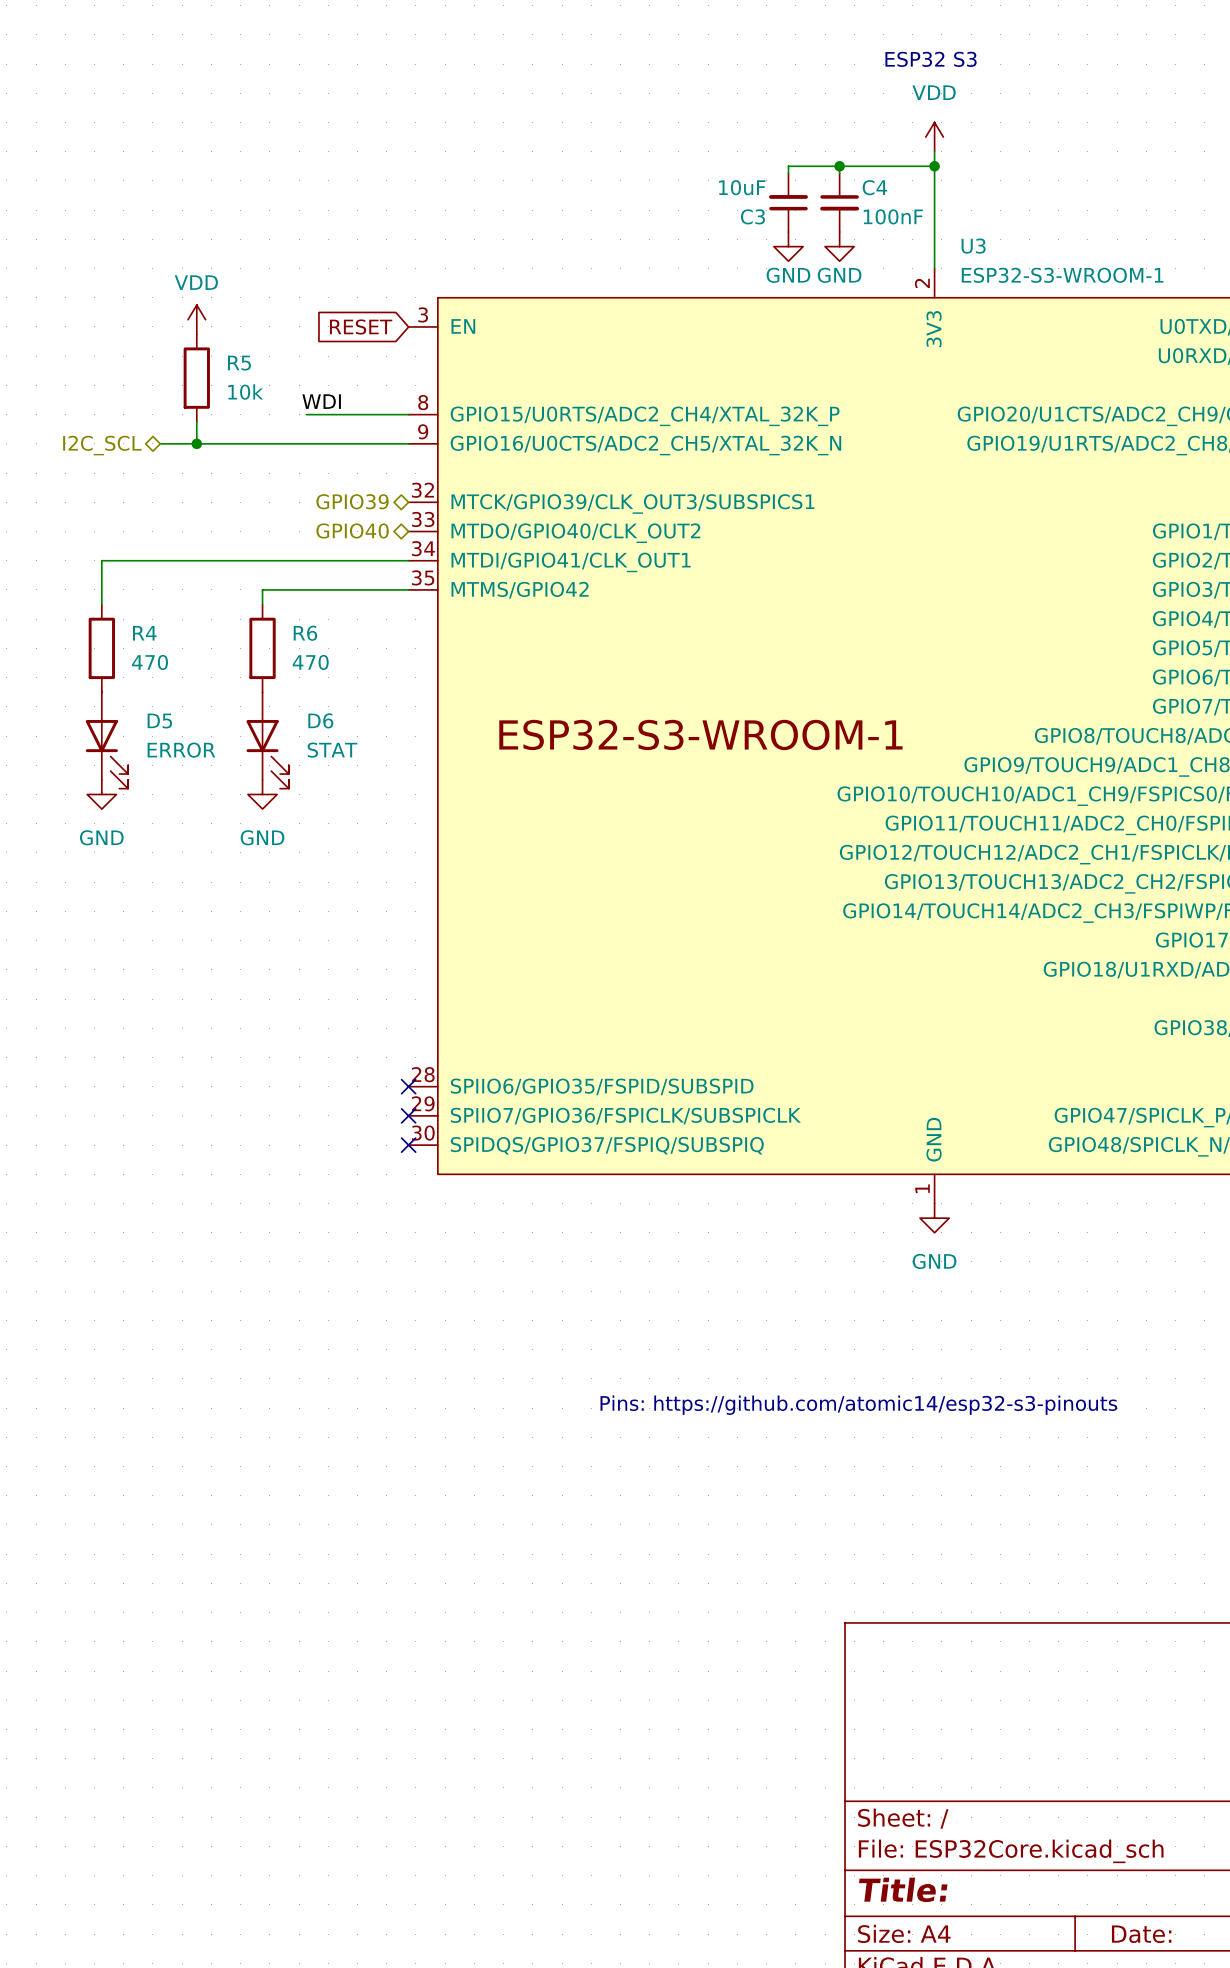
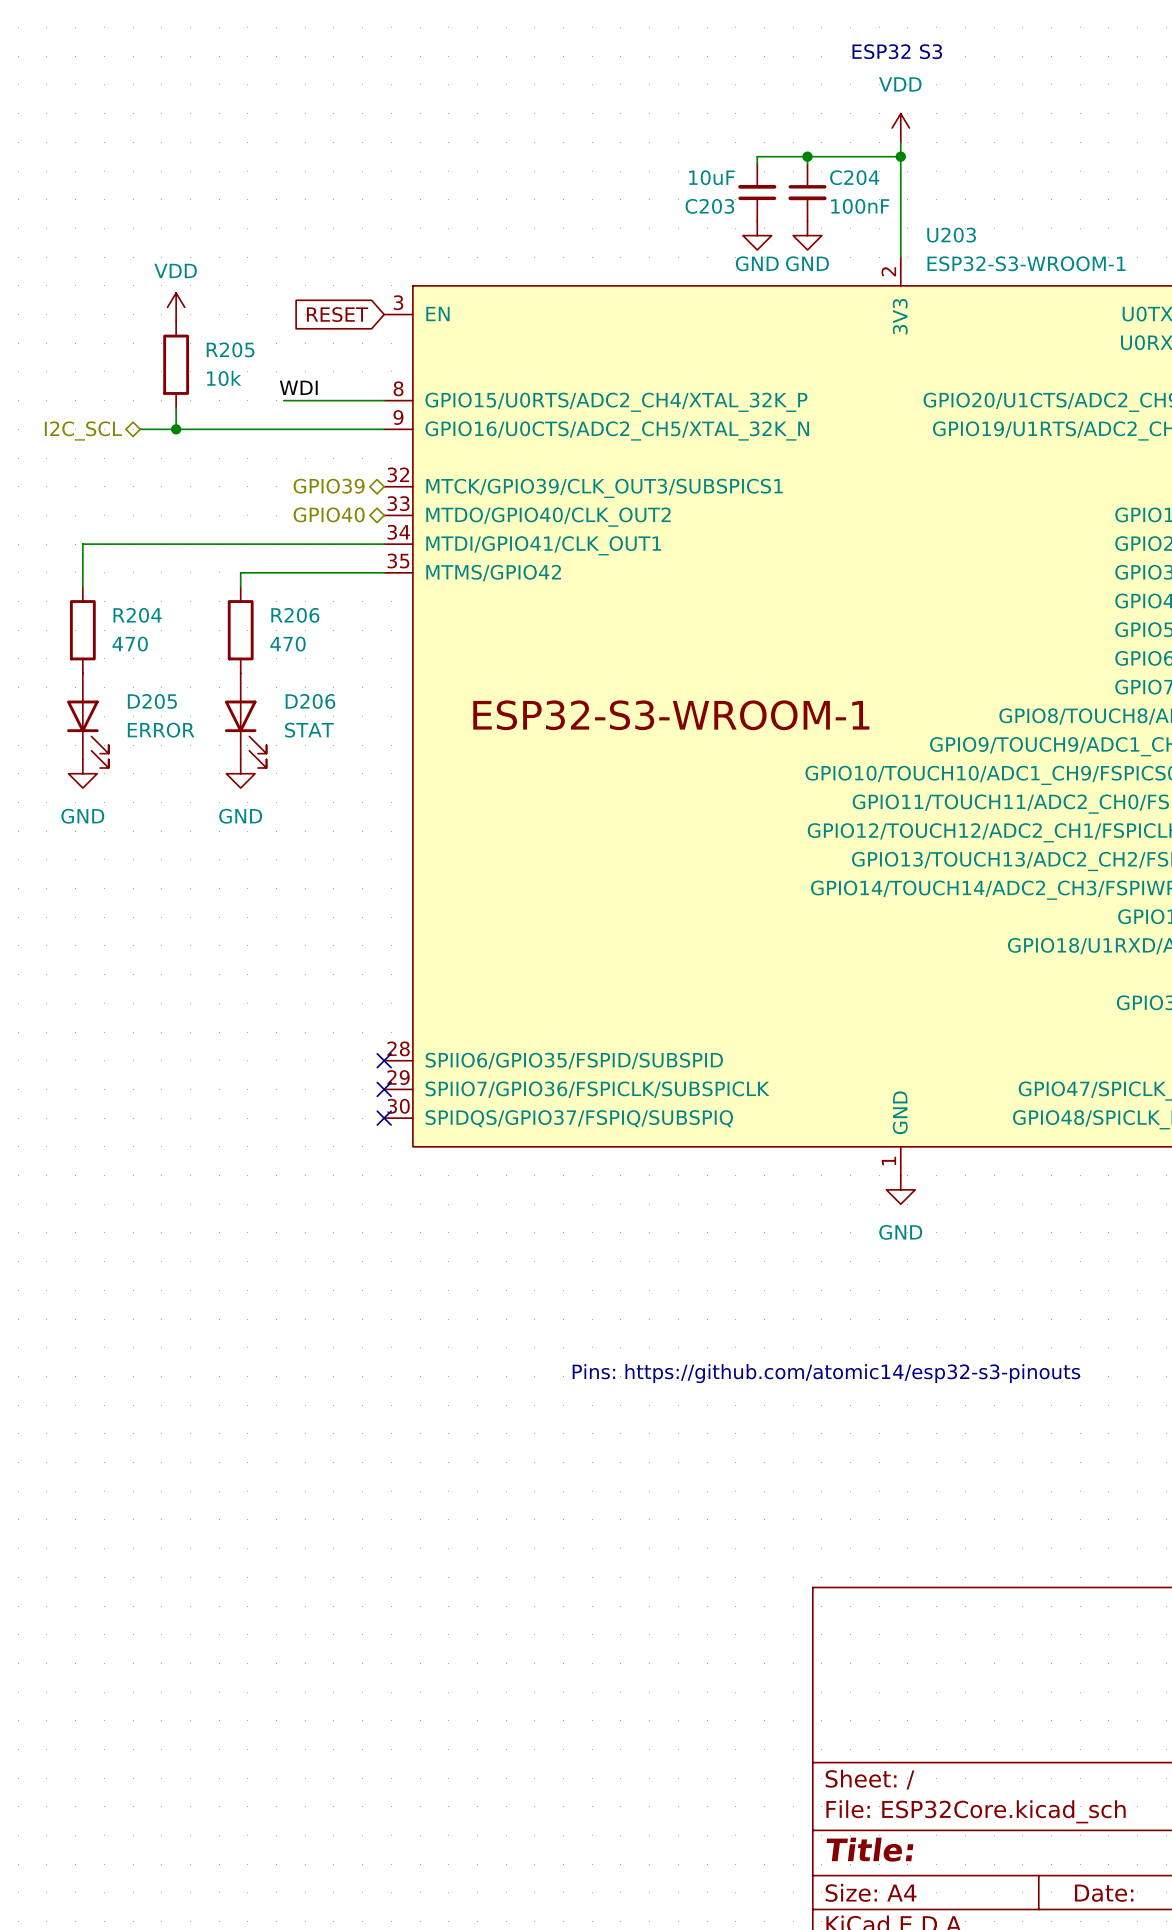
C4 name: C4 (874, 187) -> C204 (854, 177)
C3 name: C3 (752, 216) -> C203 (709, 206)
U3 name: U3 (973, 246) -> U203 (951, 235)
R5 name: R5 (239, 363) -> R205 (230, 349)
R4 name: R4 (144, 633) -> R204 (137, 615)
R6 name: R6 (305, 633) -> R206 (295, 615)
D6 name: D6 (320, 720) -> D206 (310, 701)
D5 name: D5 (159, 721) -> D205 (152, 701)

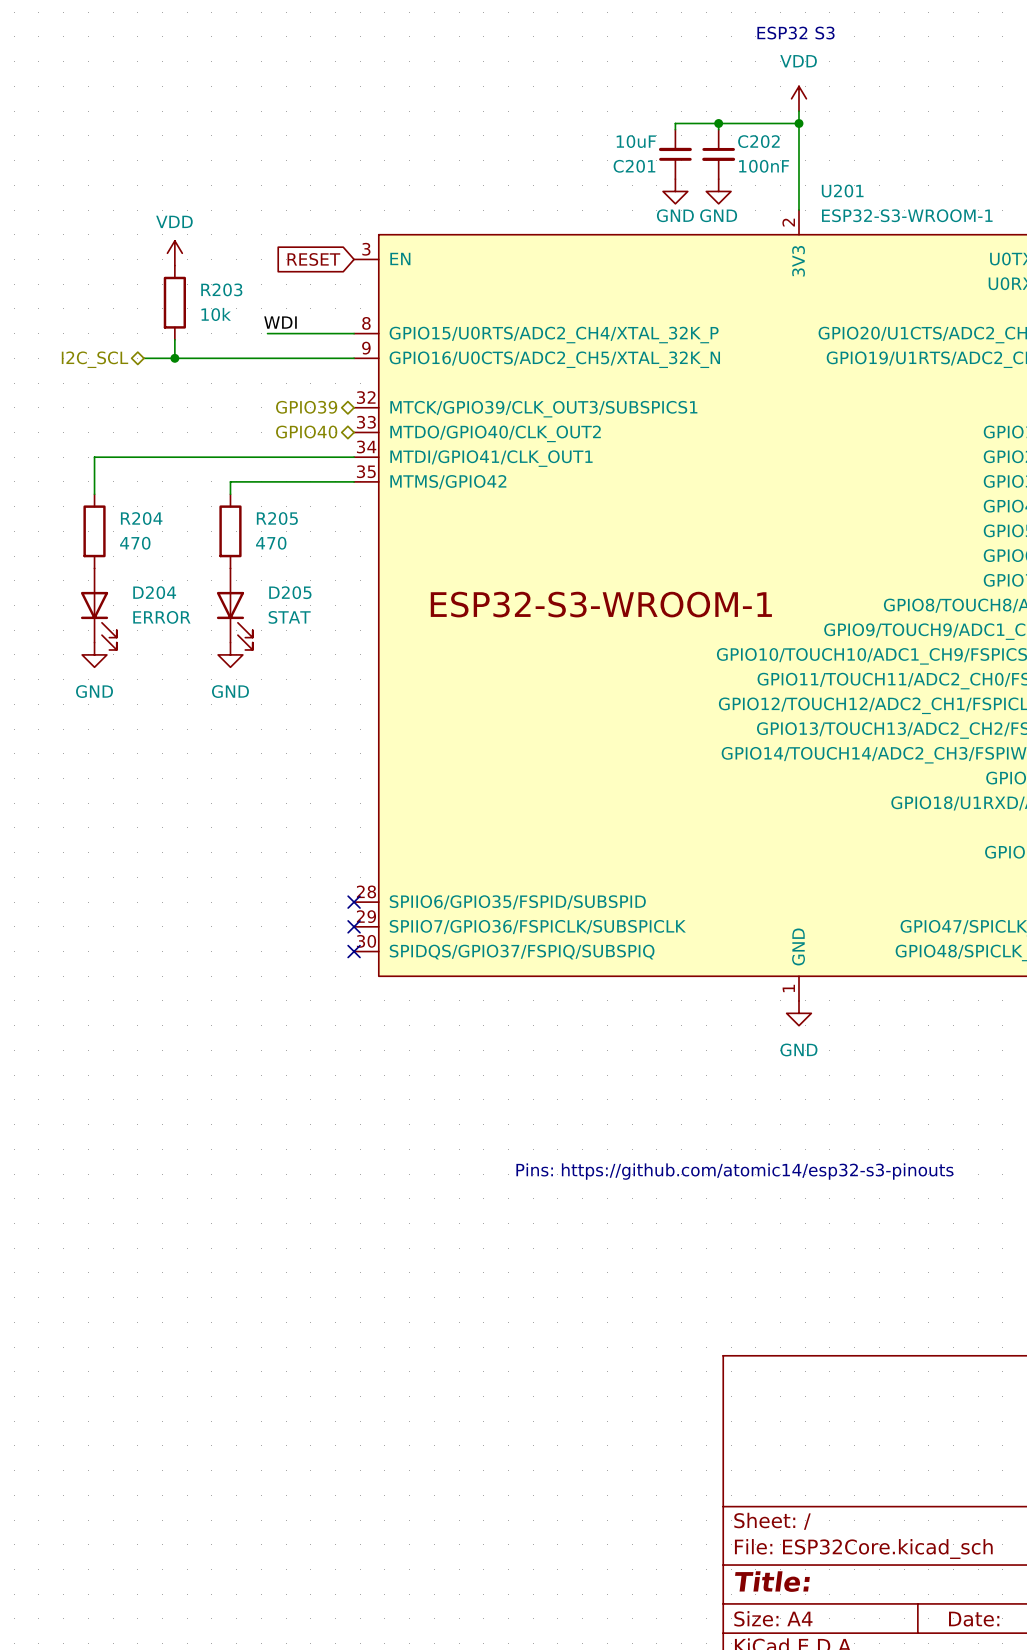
C204 name: C204 (854, 177) -> C202 (758, 141)
C203 name: C203 (709, 206) -> C201 (634, 166)
U203 name: U203 (951, 235) -> U201 (842, 191)
R205 name: R205 (230, 349) -> R203 (221, 289)
R206 name: R206 (295, 615) -> R205 (277, 518)
D205 name: D205 (152, 701) -> D204 (154, 592)
D206 name: D206 (310, 701) -> D205 (290, 592)

